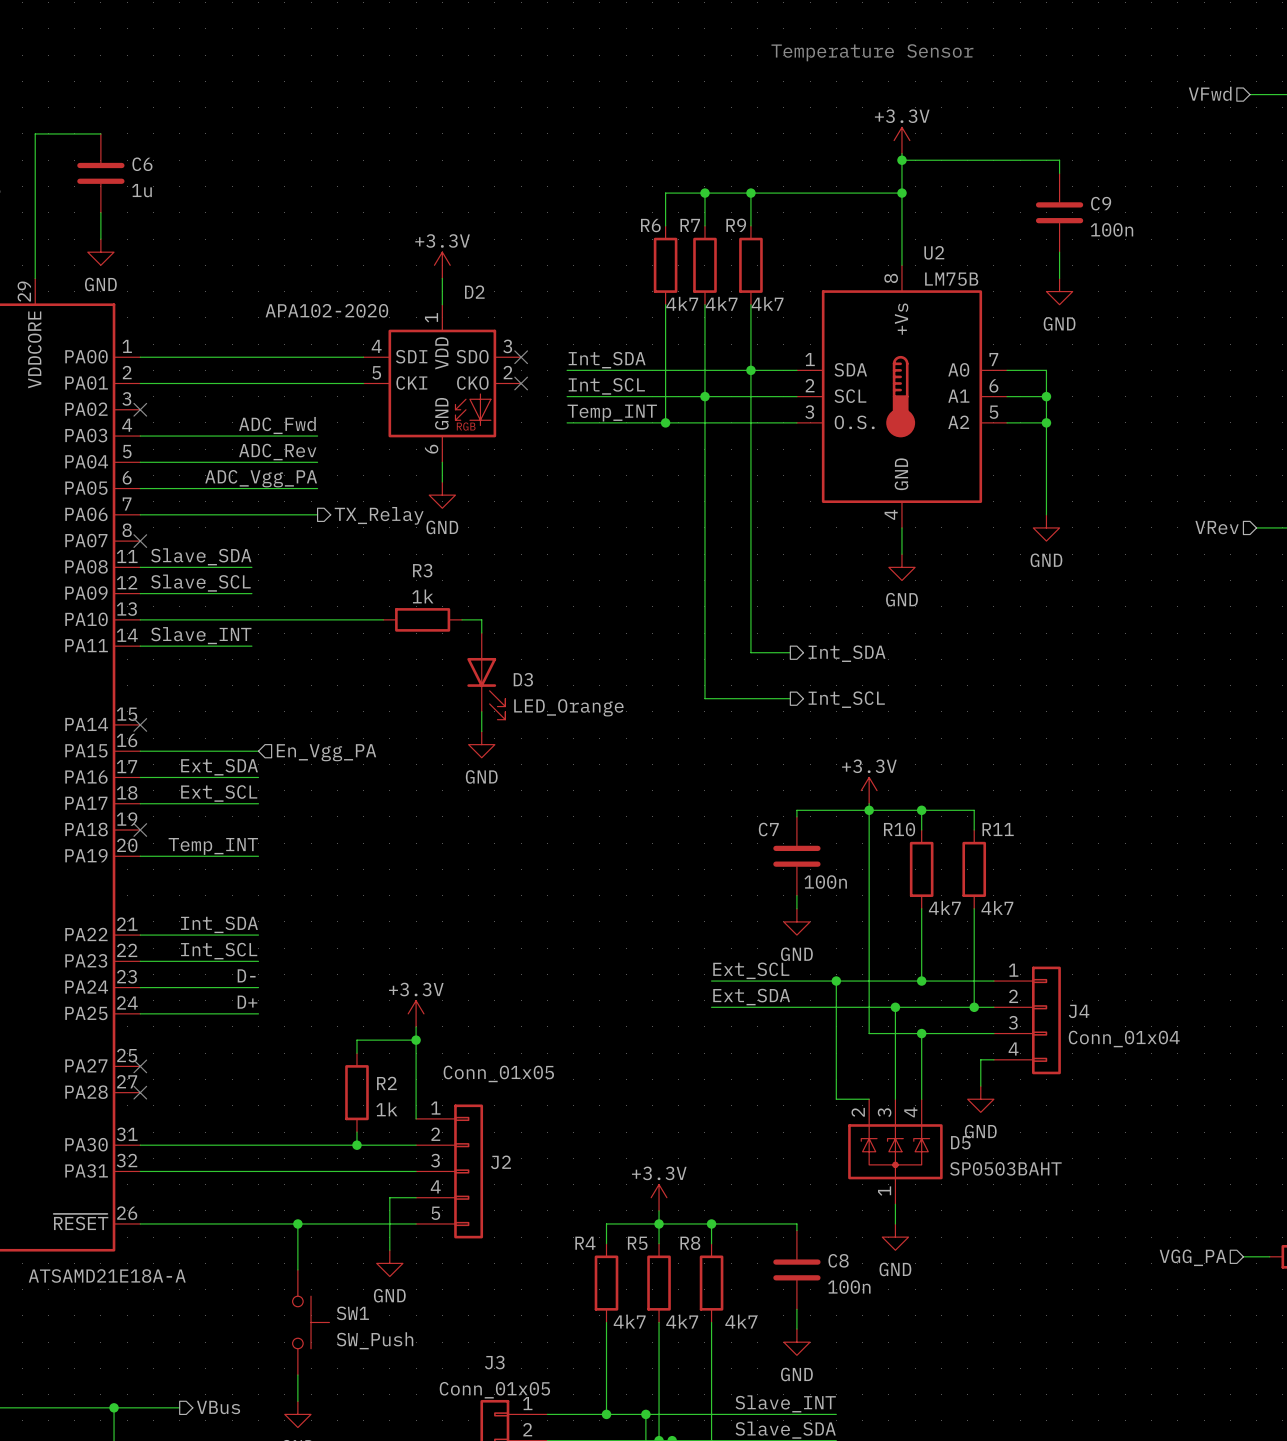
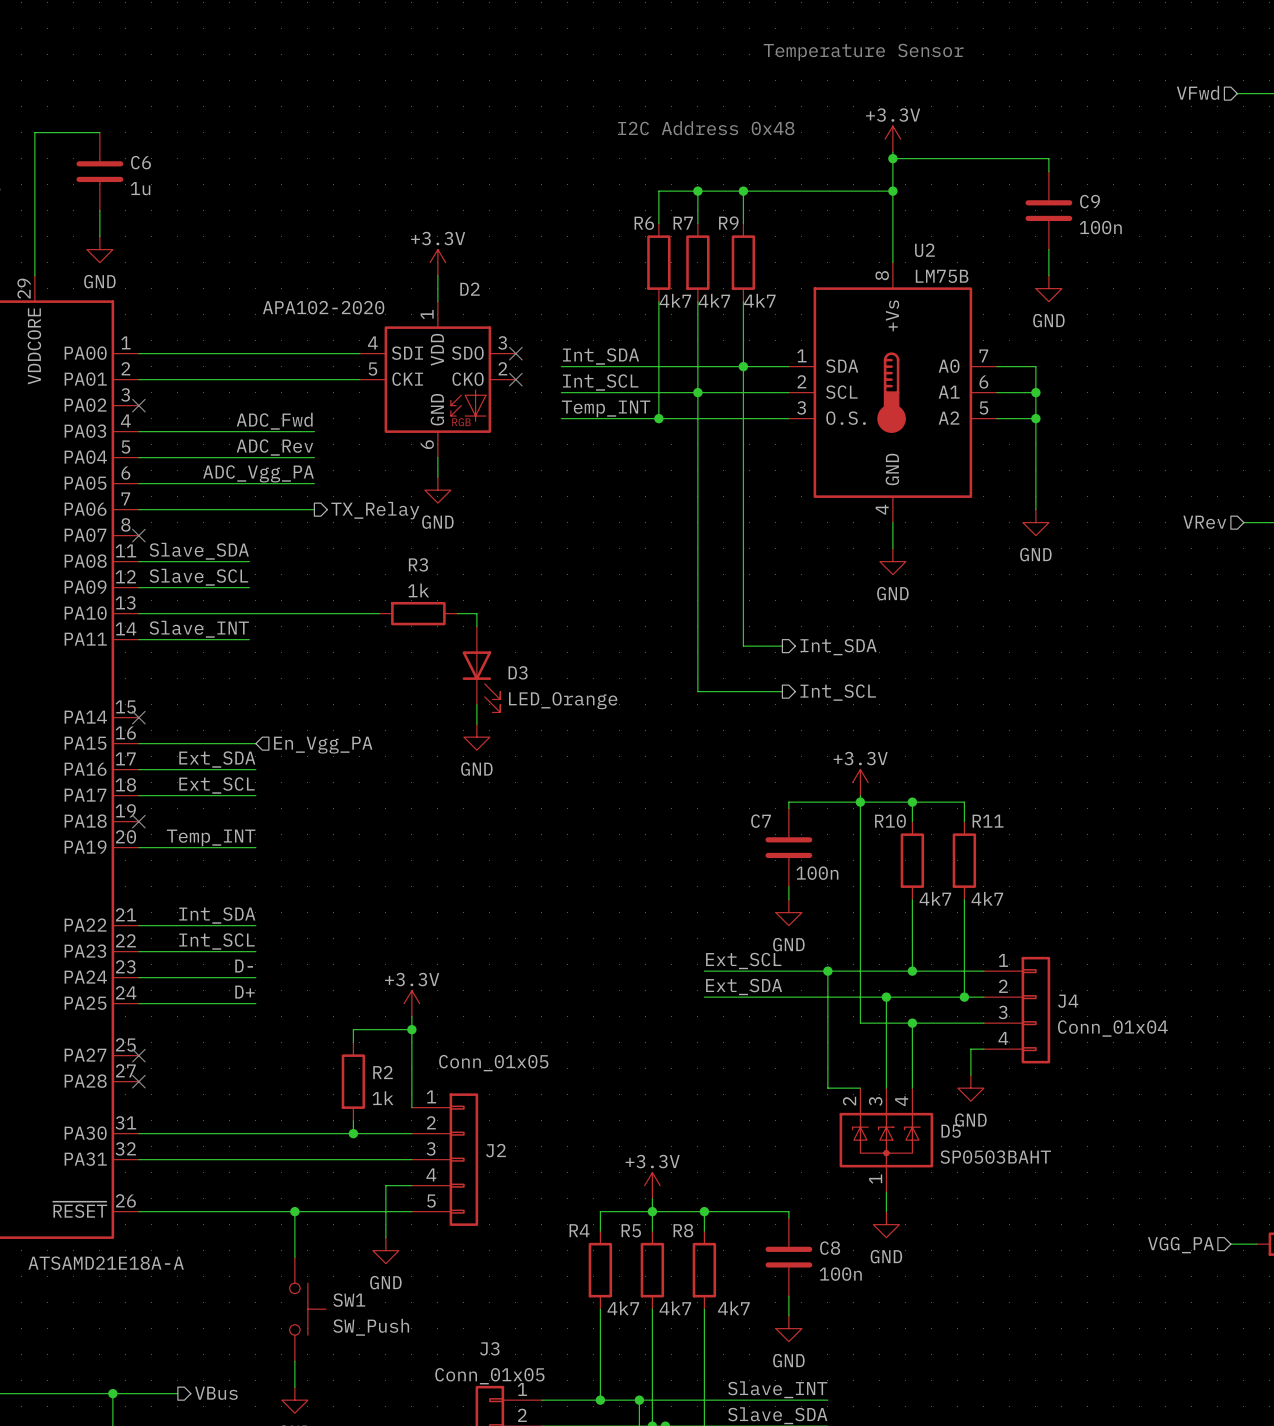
text: none -> I2C Address 0x48 (706, 128)

